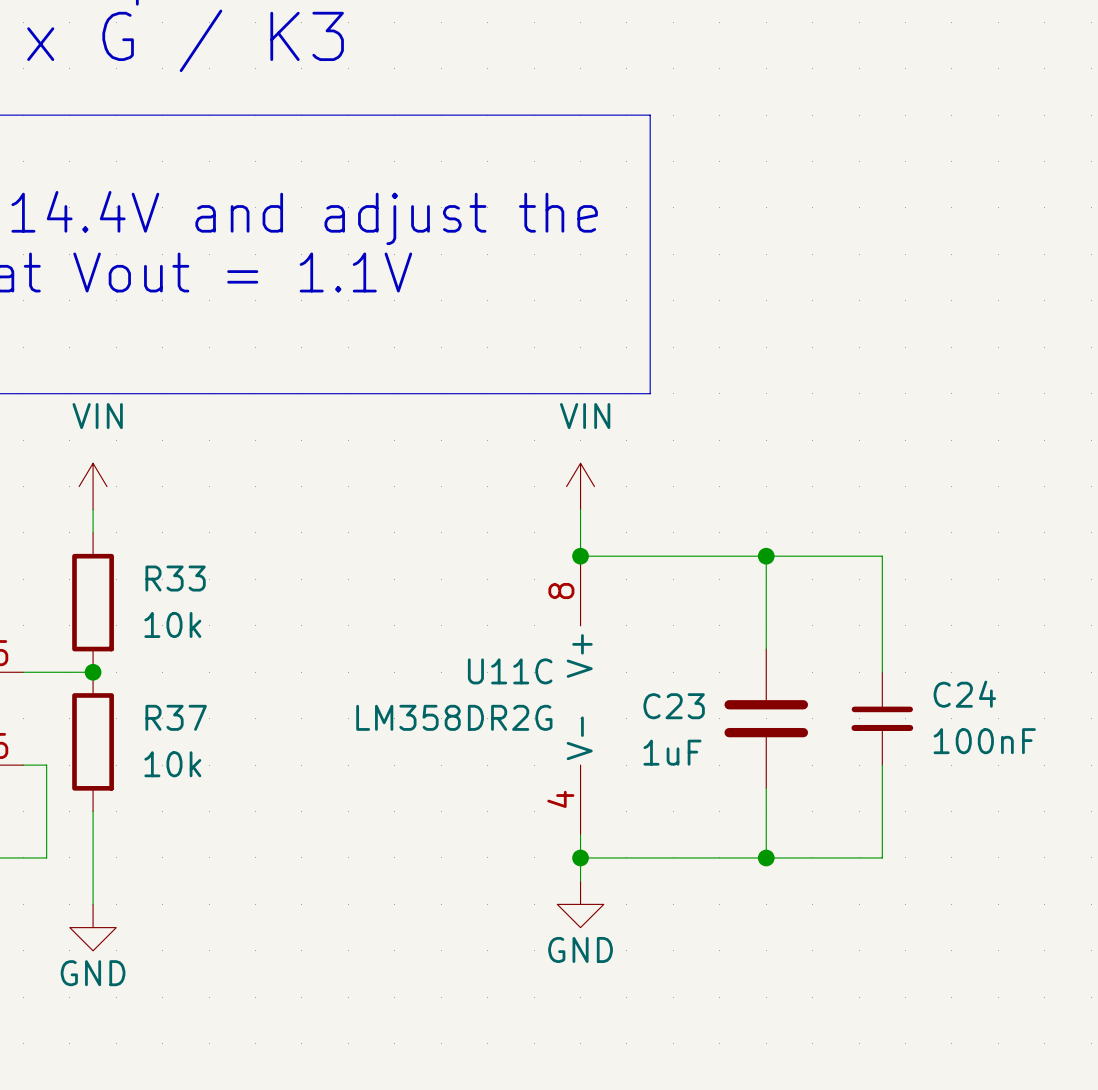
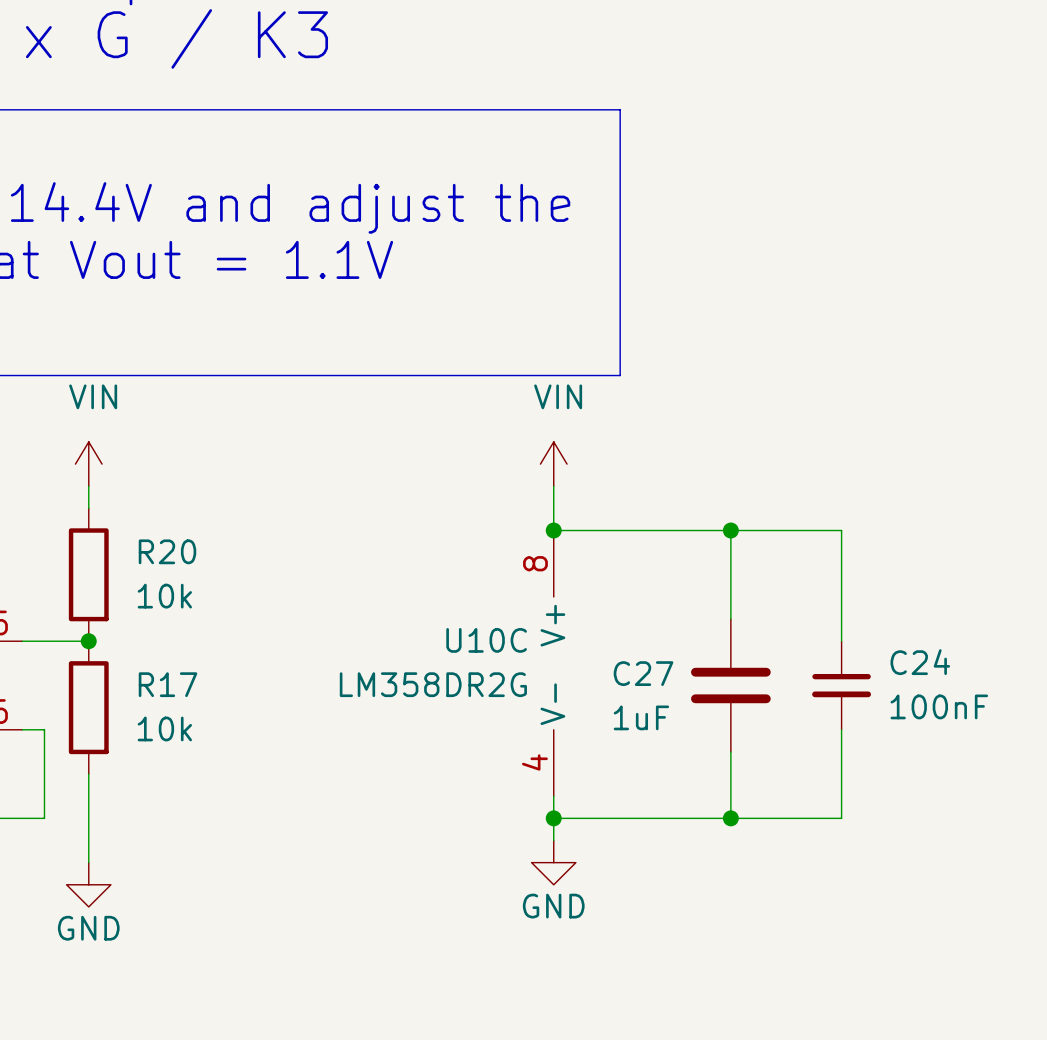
R33 name: R33 (175, 578) -> R20 (167, 551)
U11C name: U11C (510, 671) -> U10C (486, 640)
C23 name: C23 (674, 706) -> C27 (643, 673)
R37 name: R37 (176, 717) -> R17 (168, 684)

